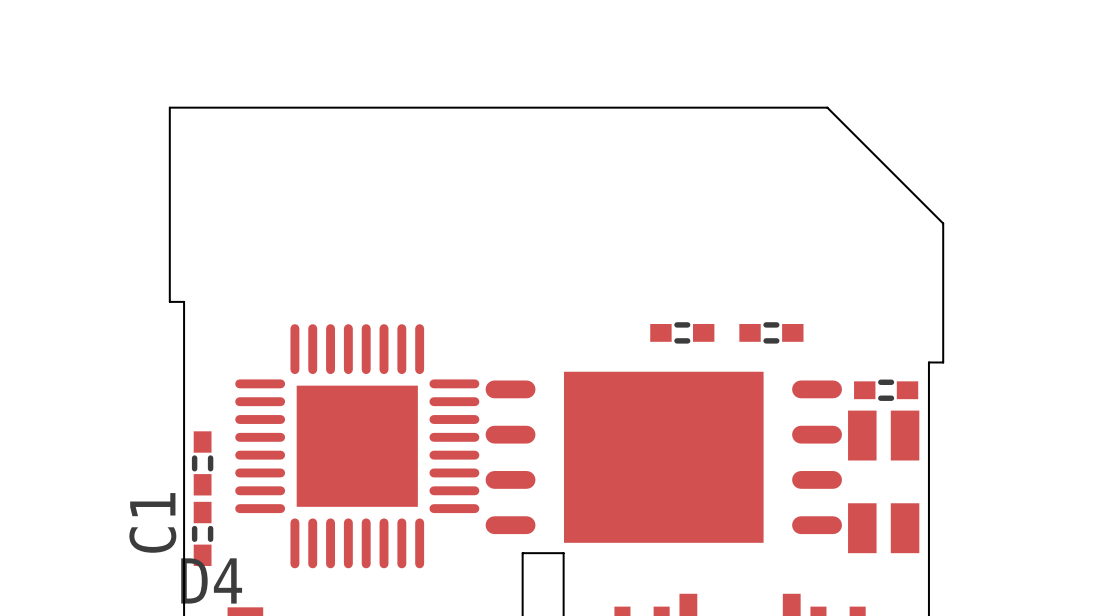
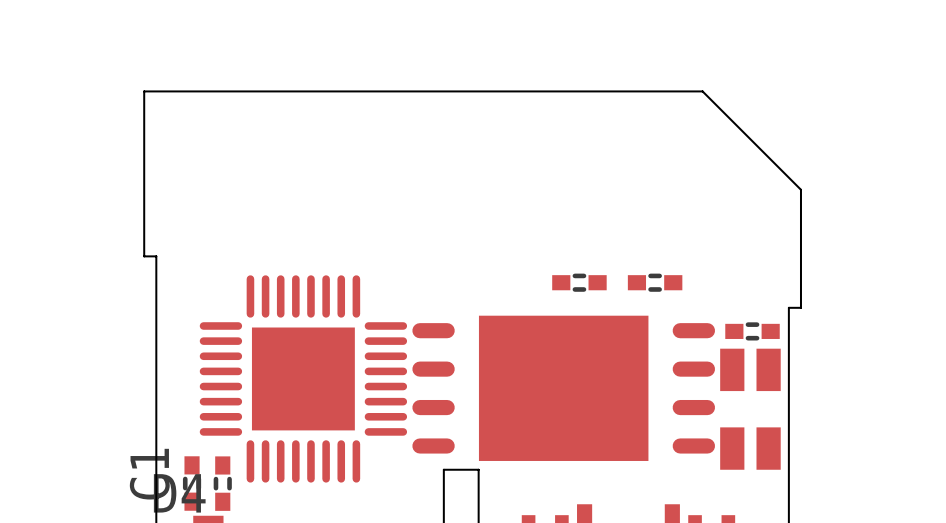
part position: (202, 463) -> (222, 483)
C1 position: (202, 533) -> (192, 483)

